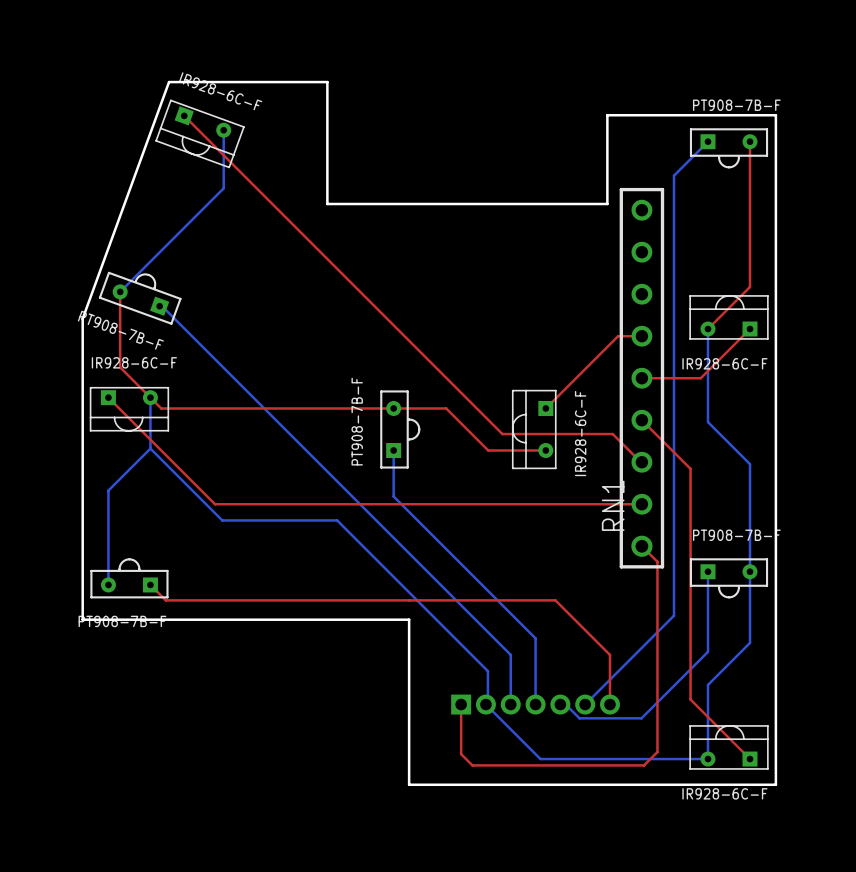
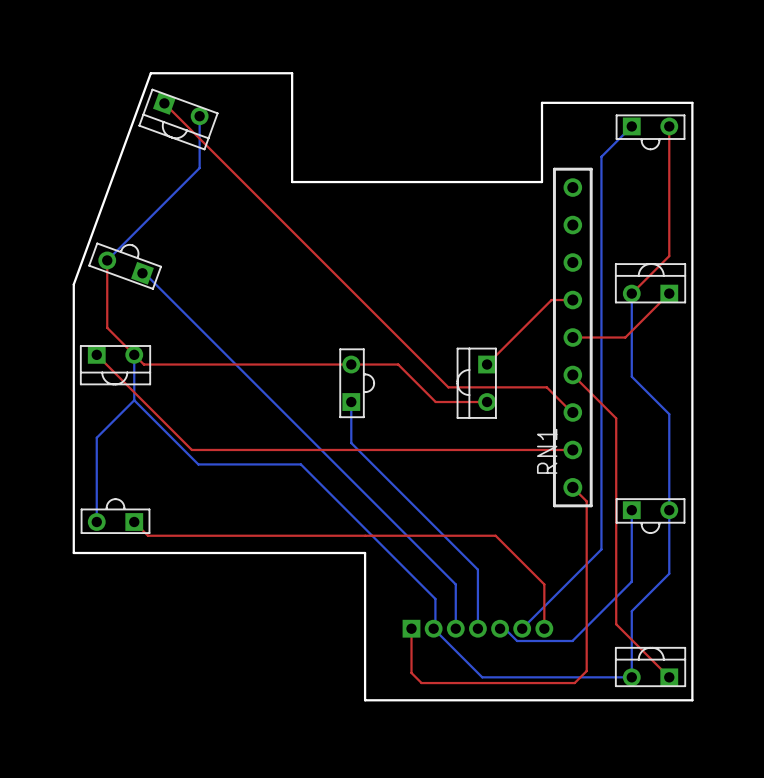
part footprint: [155, 99, 245, 169] -> [138, 88, 219, 151]
part footprint: [689, 128, 769, 169] -> [615, 114, 686, 151]
part footprint: [98, 271, 182, 325] -> [88, 242, 162, 290]
part footprint: [689, 295, 769, 340] -> [615, 263, 686, 304]
part footprint: [89, 386, 170, 432] -> [80, 345, 151, 386]
part footprint: [511, 389, 557, 470] -> [456, 347, 497, 419]
part footprint: [380, 390, 421, 469] -> [339, 348, 376, 419]
part footprint: [90, 558, 169, 599] -> [80, 498, 151, 535]
part footprint: [689, 558, 769, 599] -> [615, 498, 686, 535]
part footprint: [689, 725, 769, 770] -> [615, 647, 686, 687]

